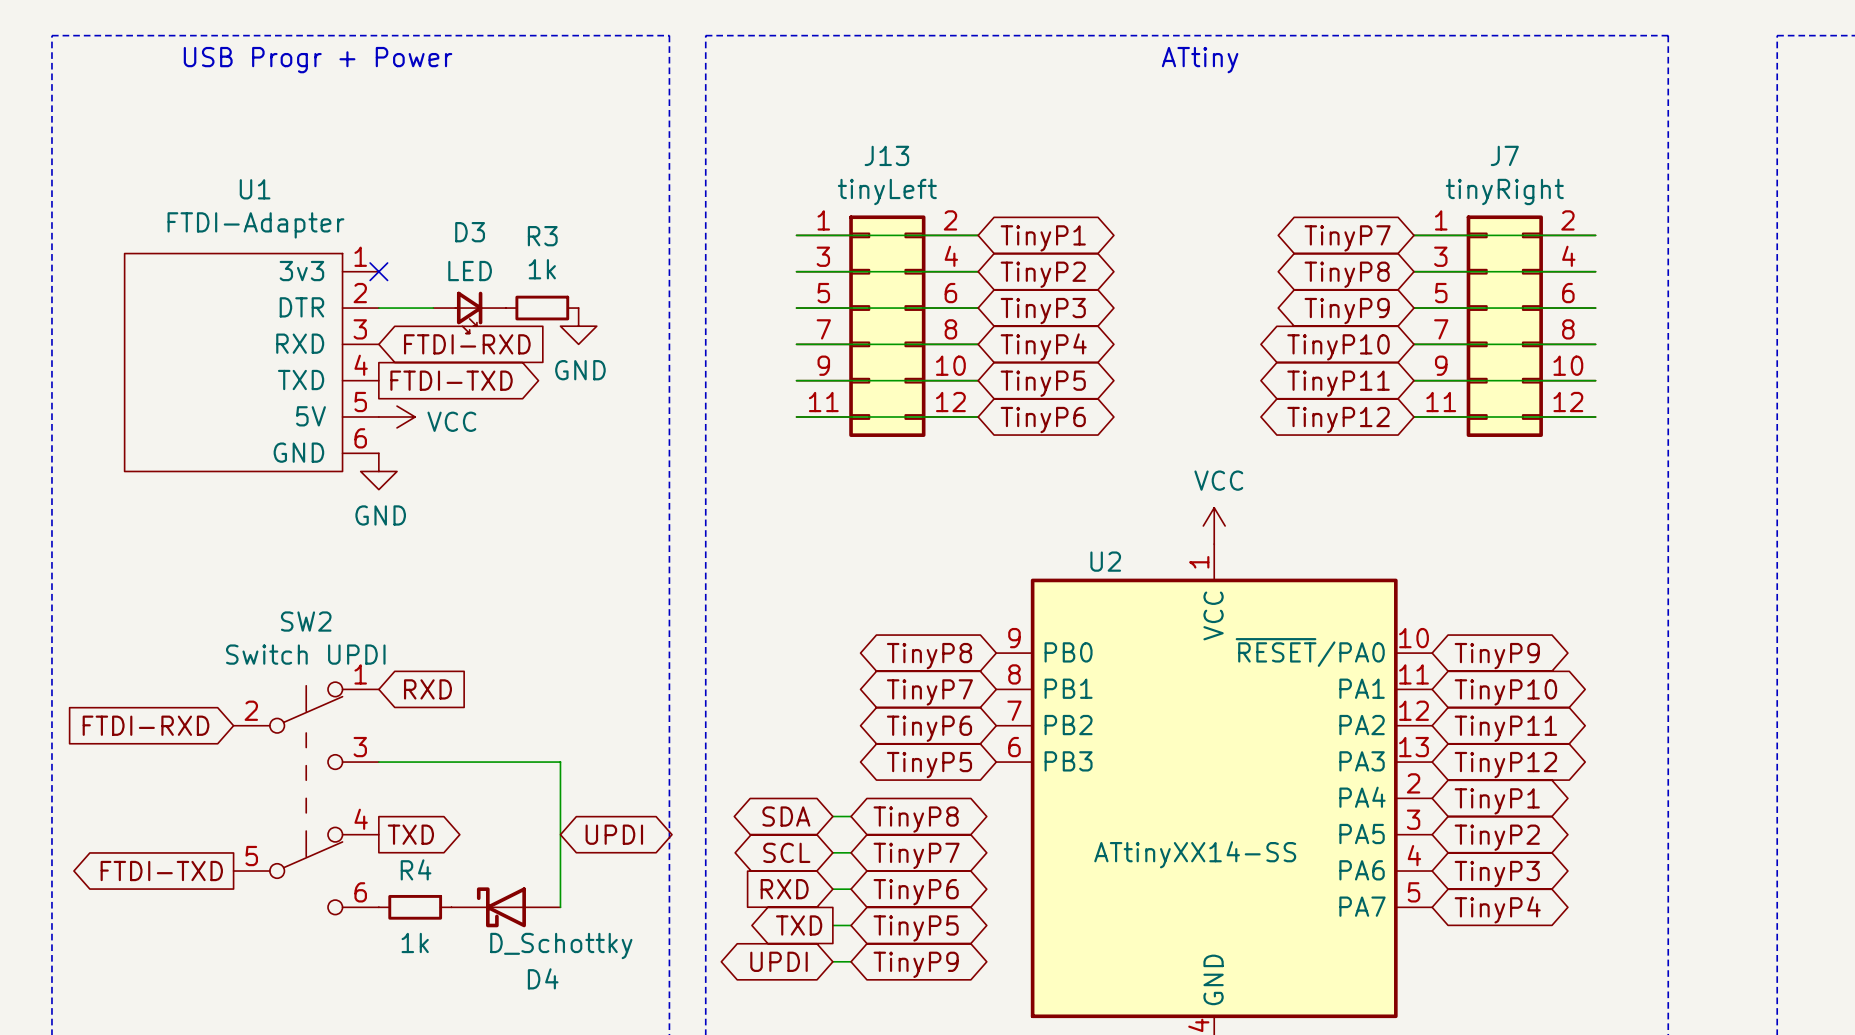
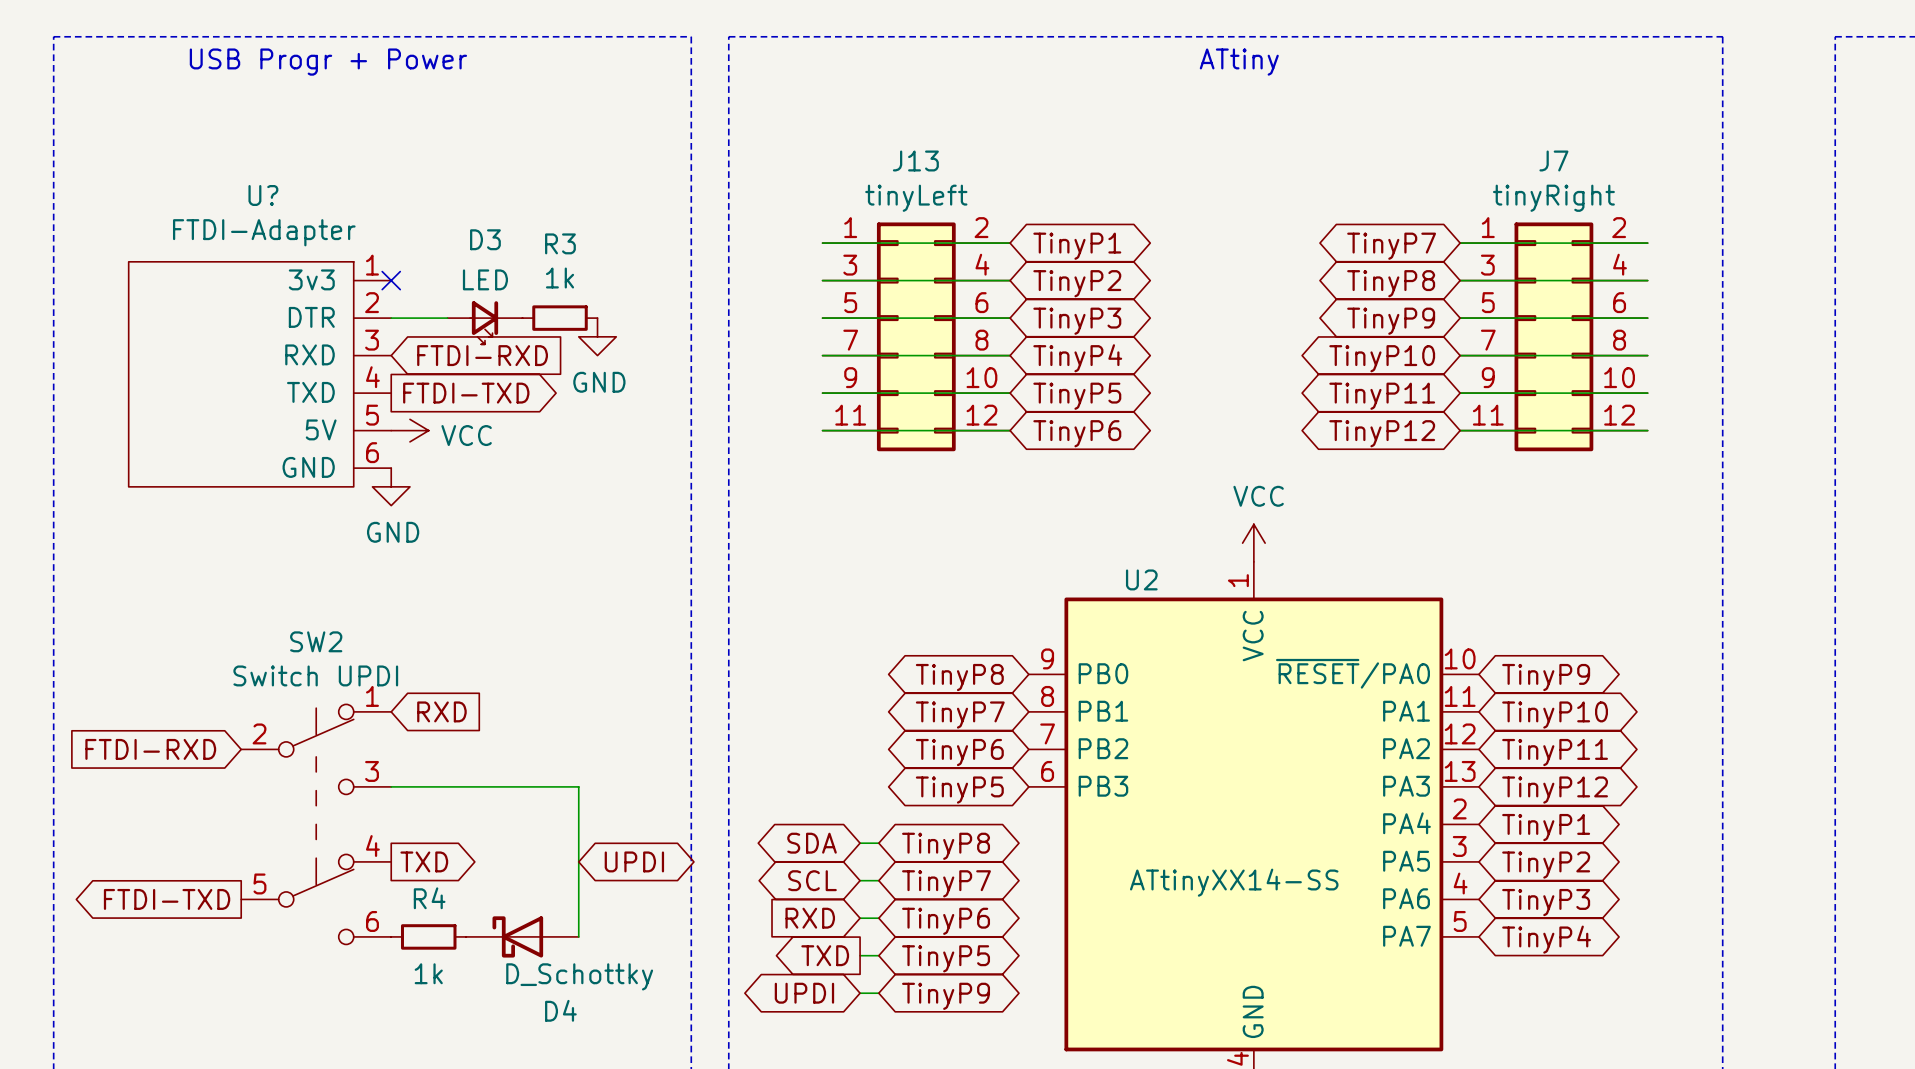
U1 name: U1 (255, 189) -> U? (263, 195)

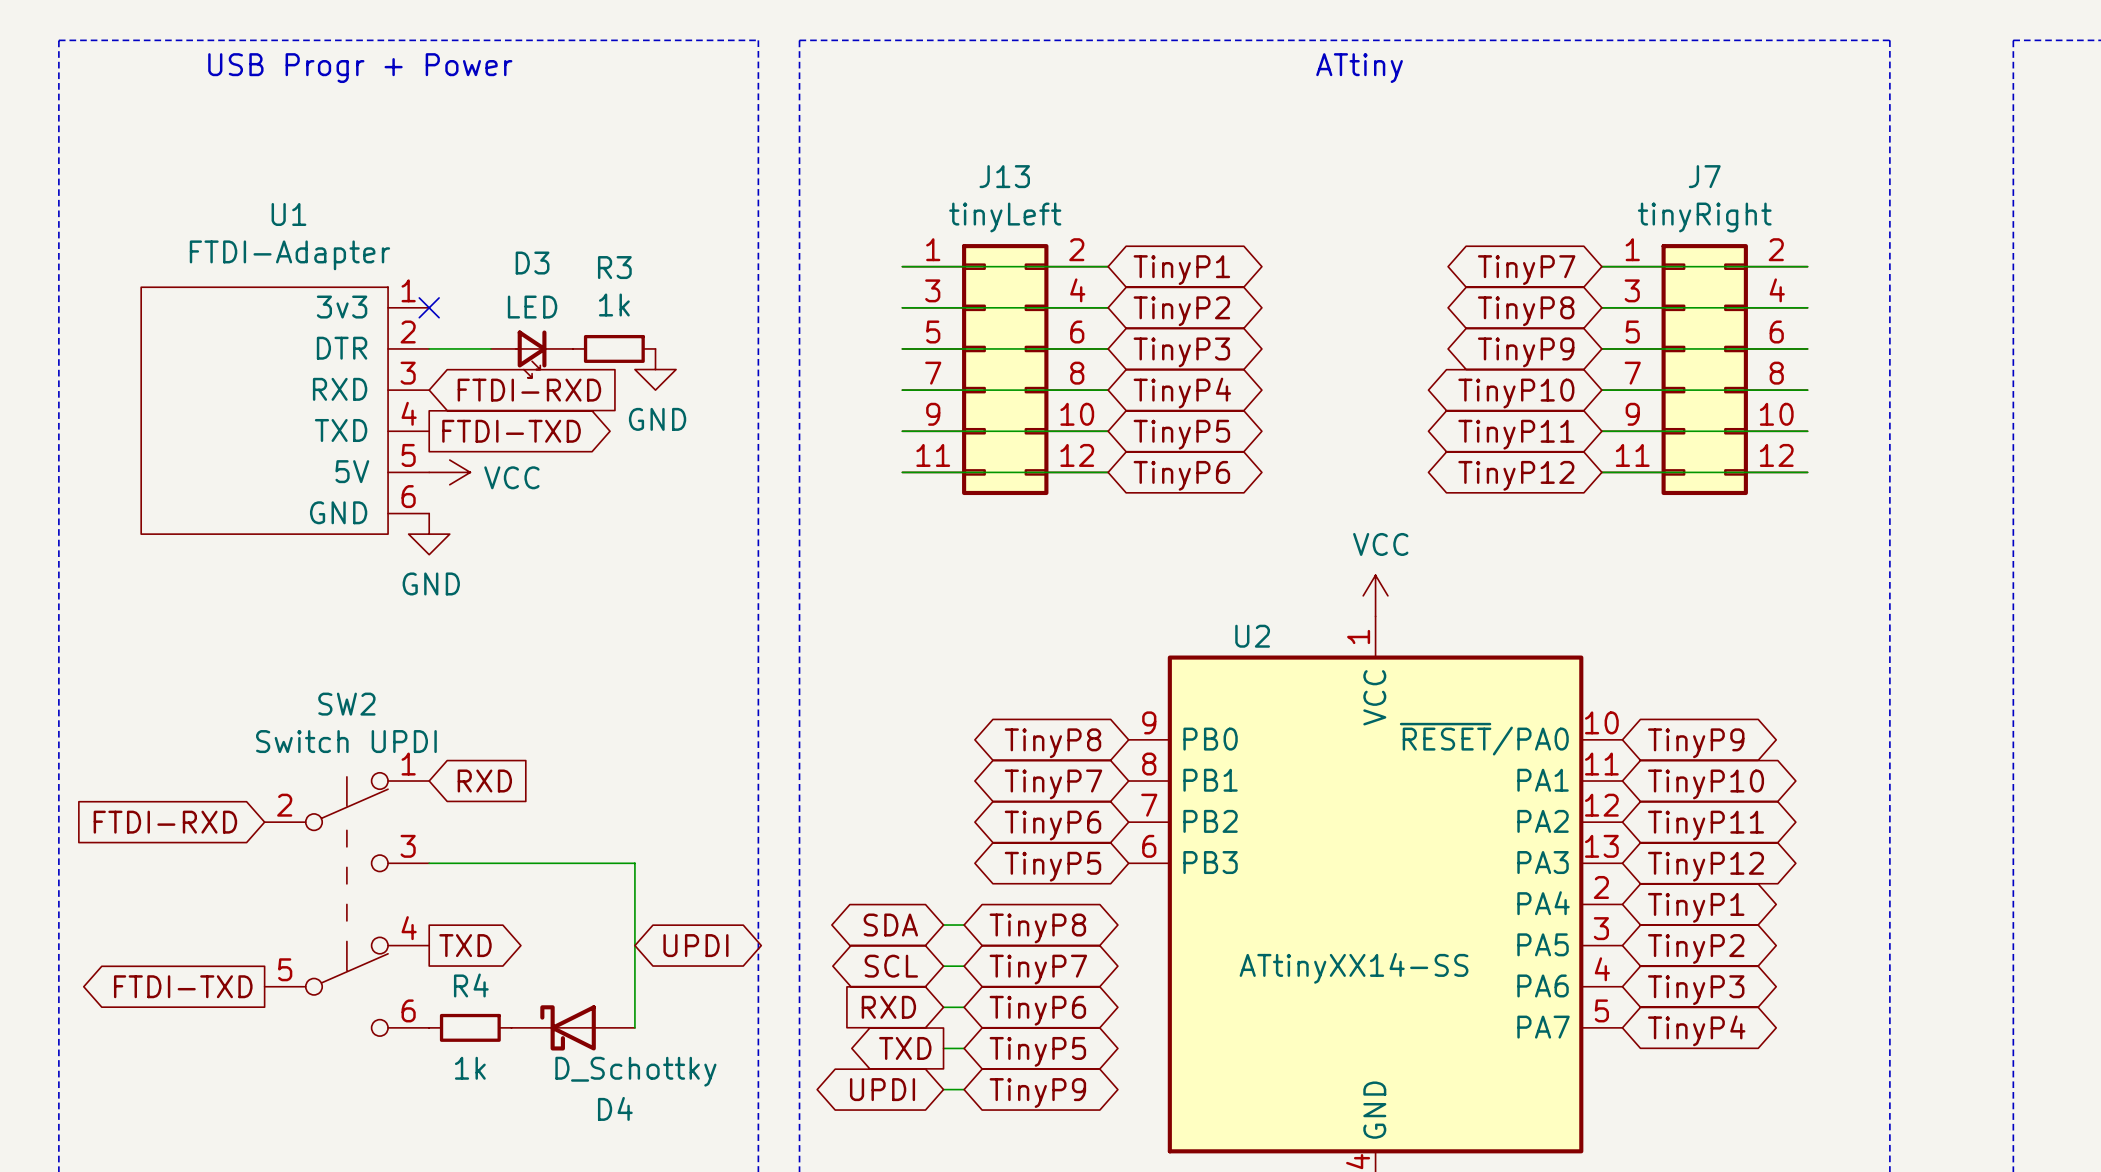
U? name: U? (263, 195) -> U1 (288, 214)

